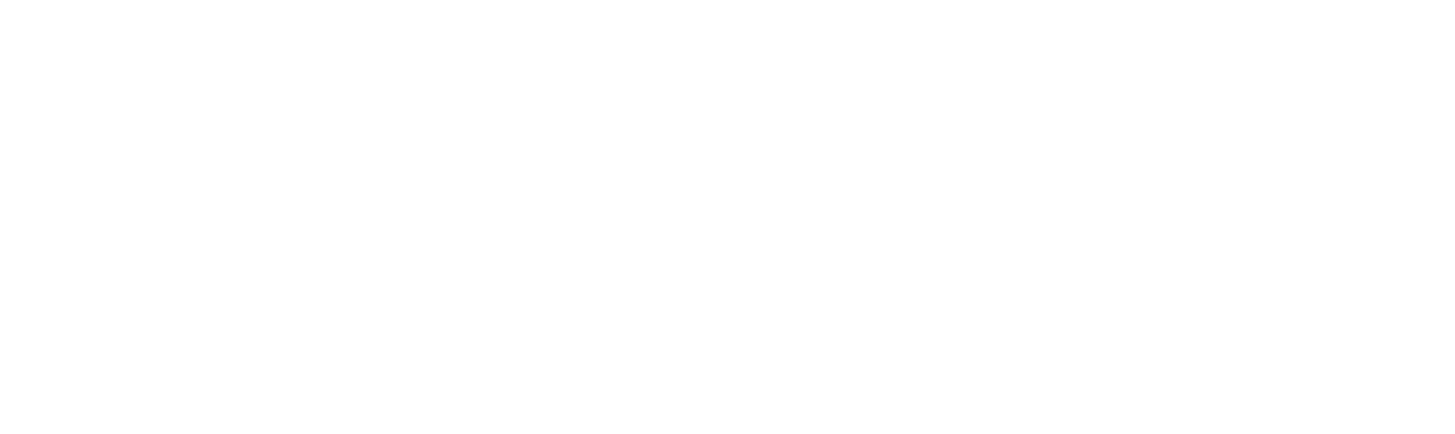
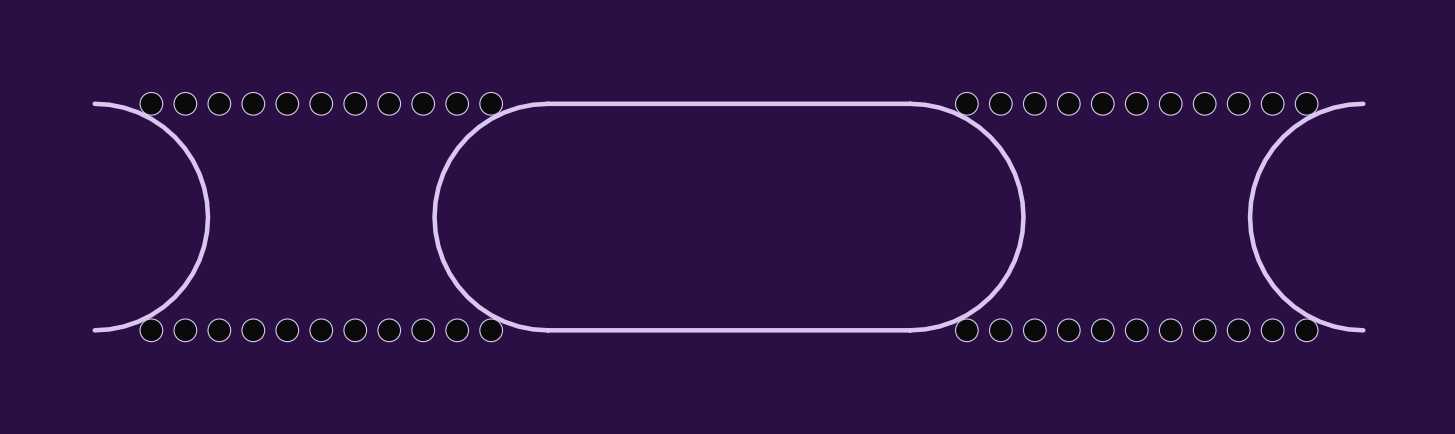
board edge: none -> (910, 103) (547, 103)
part: none -> (321, 217)
part: none -> (1136, 217)
board edge: none -> (910, 330) (547, 330)

